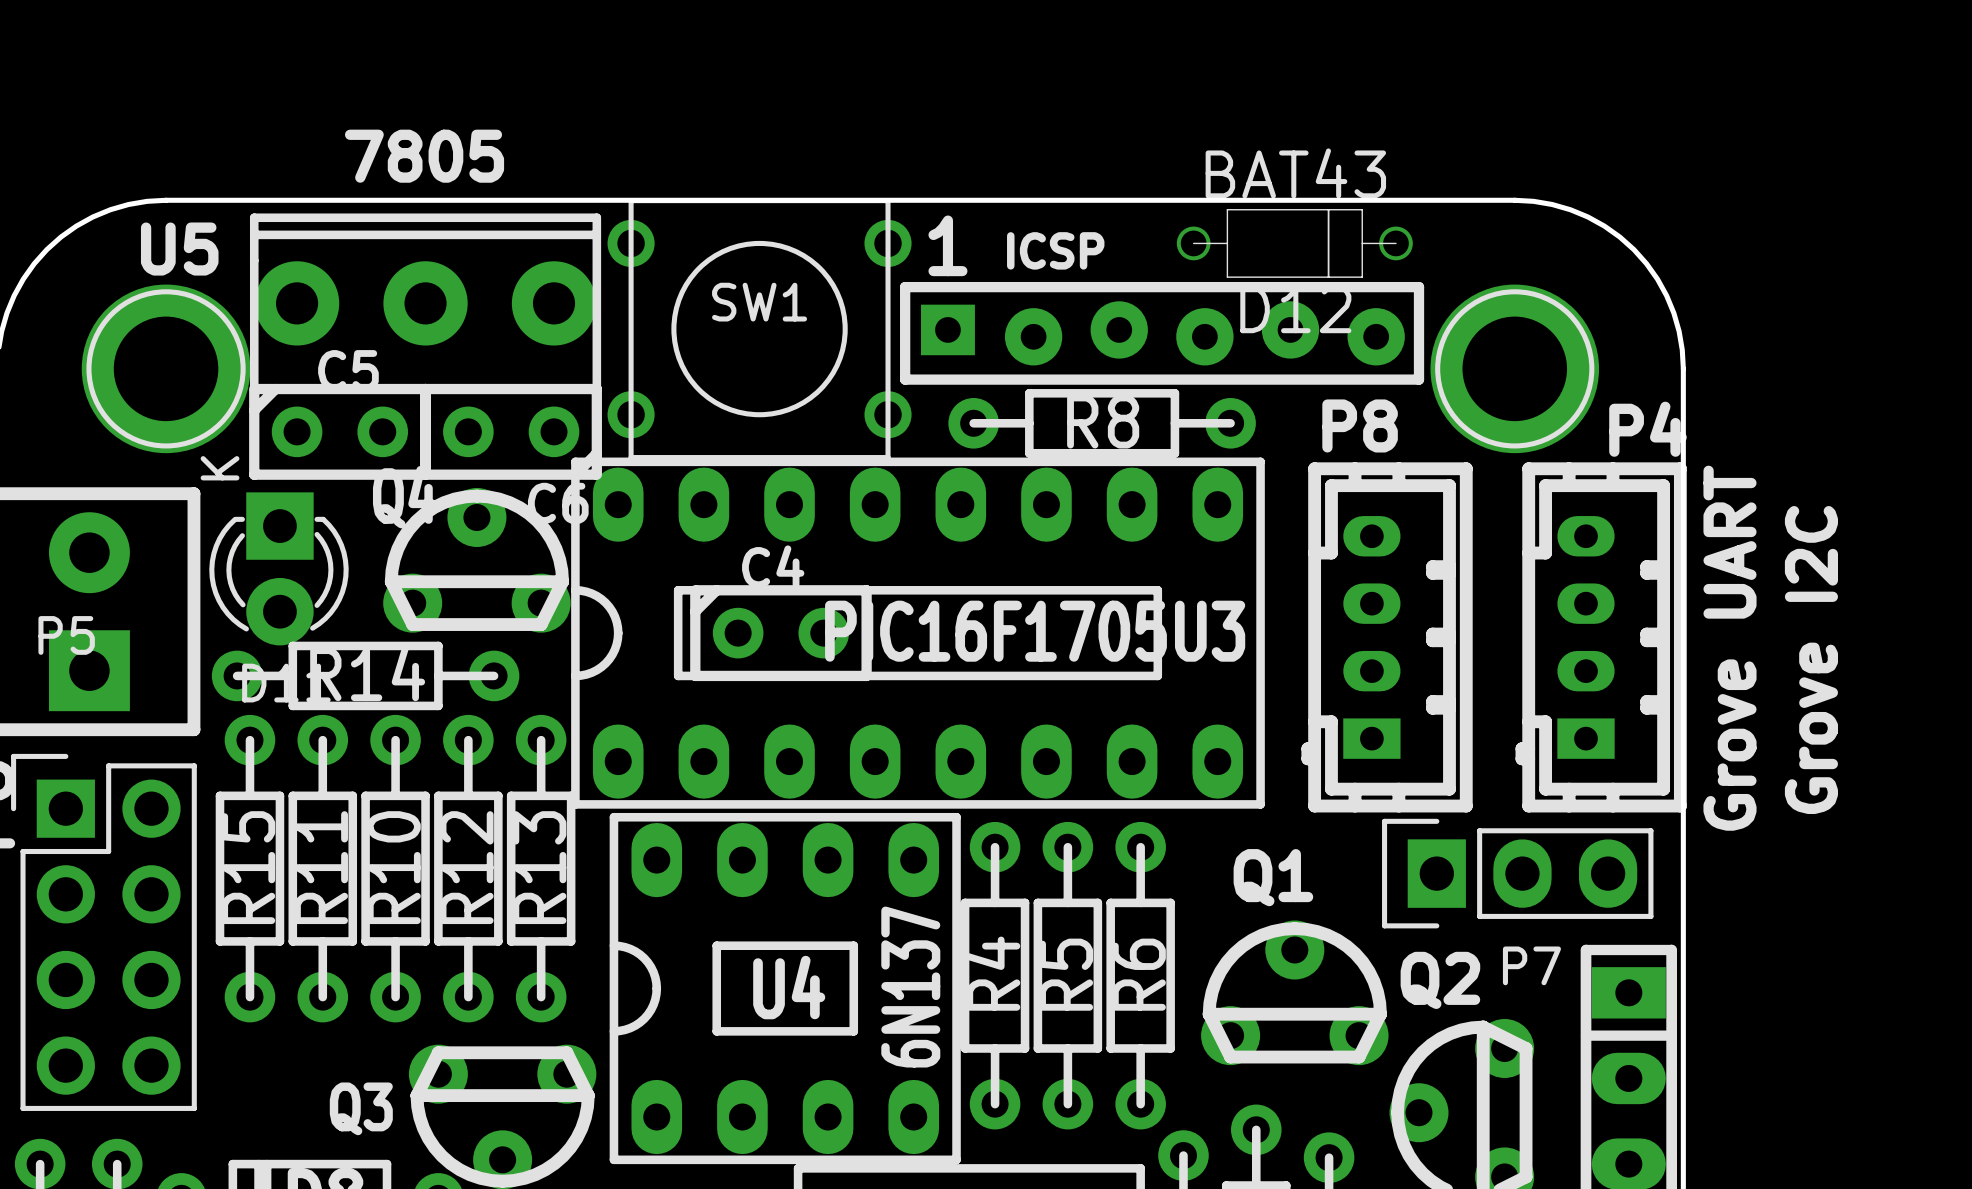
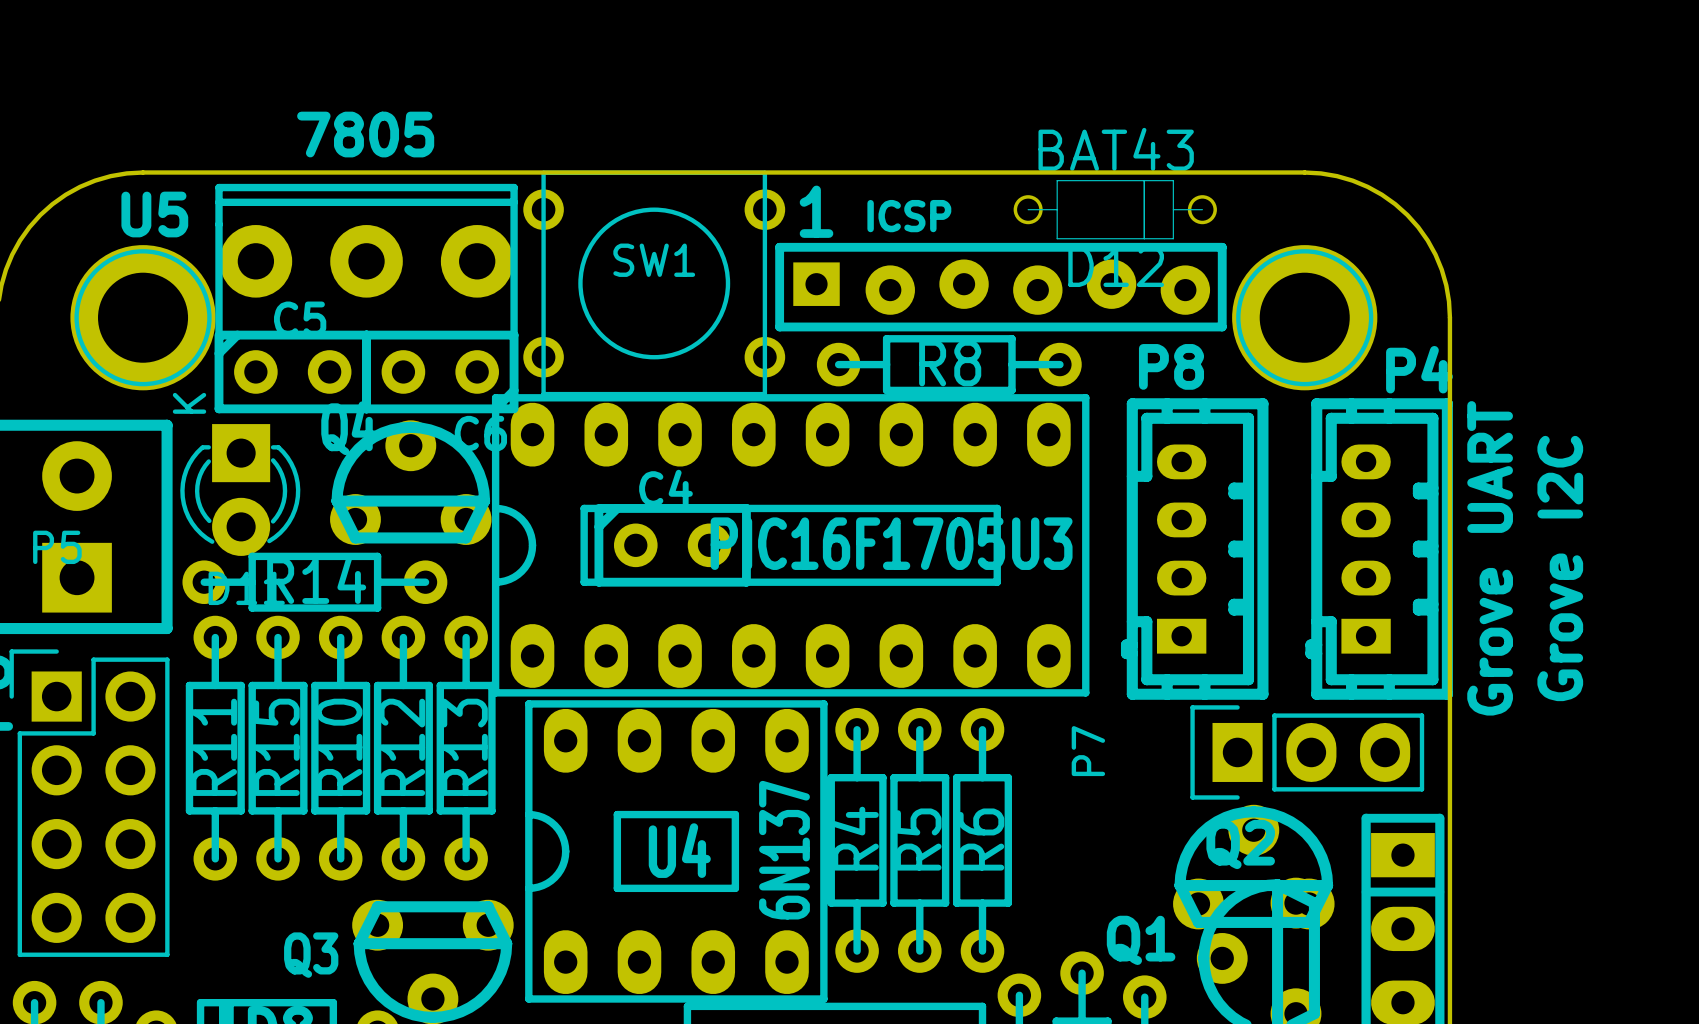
R15 name: R15 (248, 867) -> R11 (213, 747)
R11 name: R11 (321, 867) -> R15 (276, 747)
Q1 name position: Q1 (1273, 877) -> Q1 (1141, 940)
P7 name rotation: 0° (1531, 965) -> 90° counterclockwise (1088, 751)
P7 name position: P7 (1531, 965) -> P7 (1088, 751)
Q1 position: (1294, 992) -> (1253, 867)

